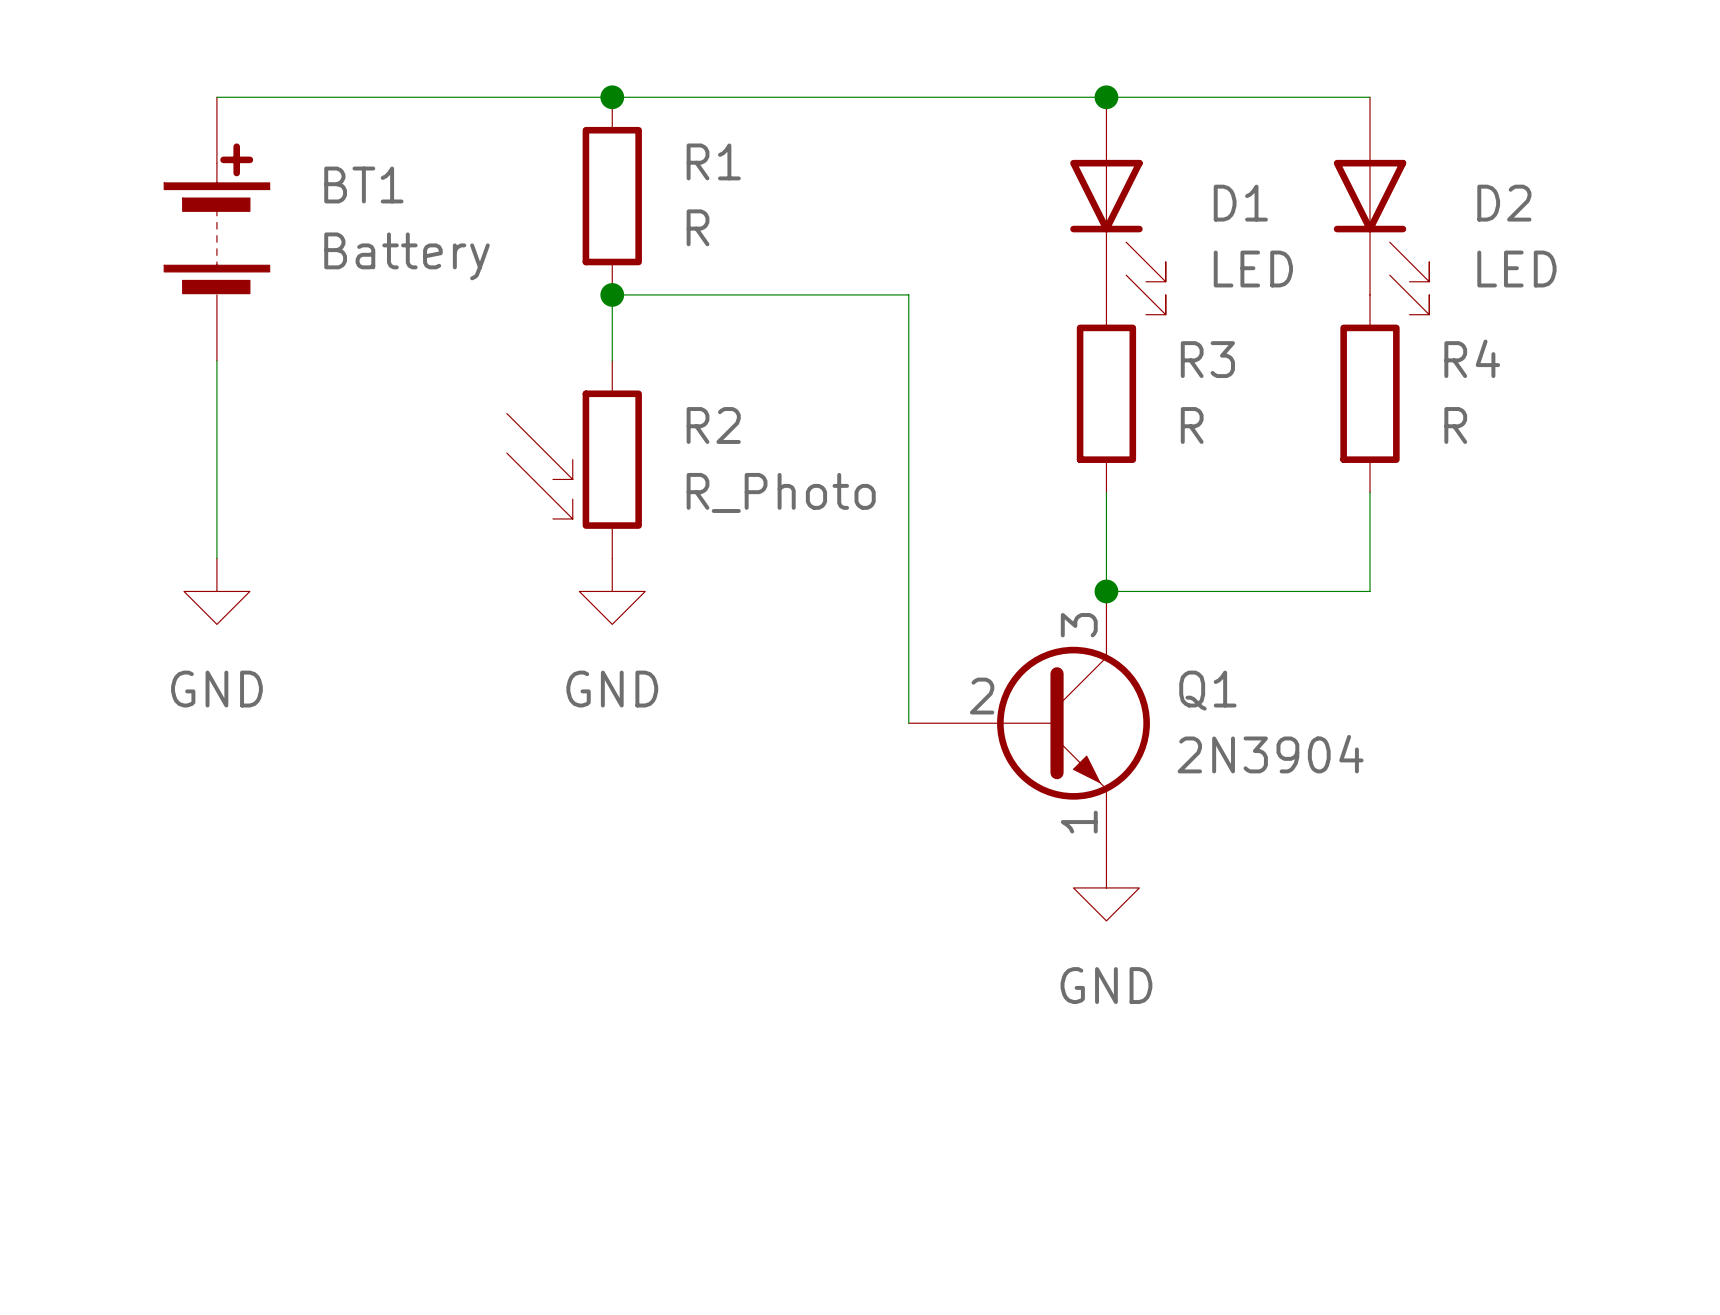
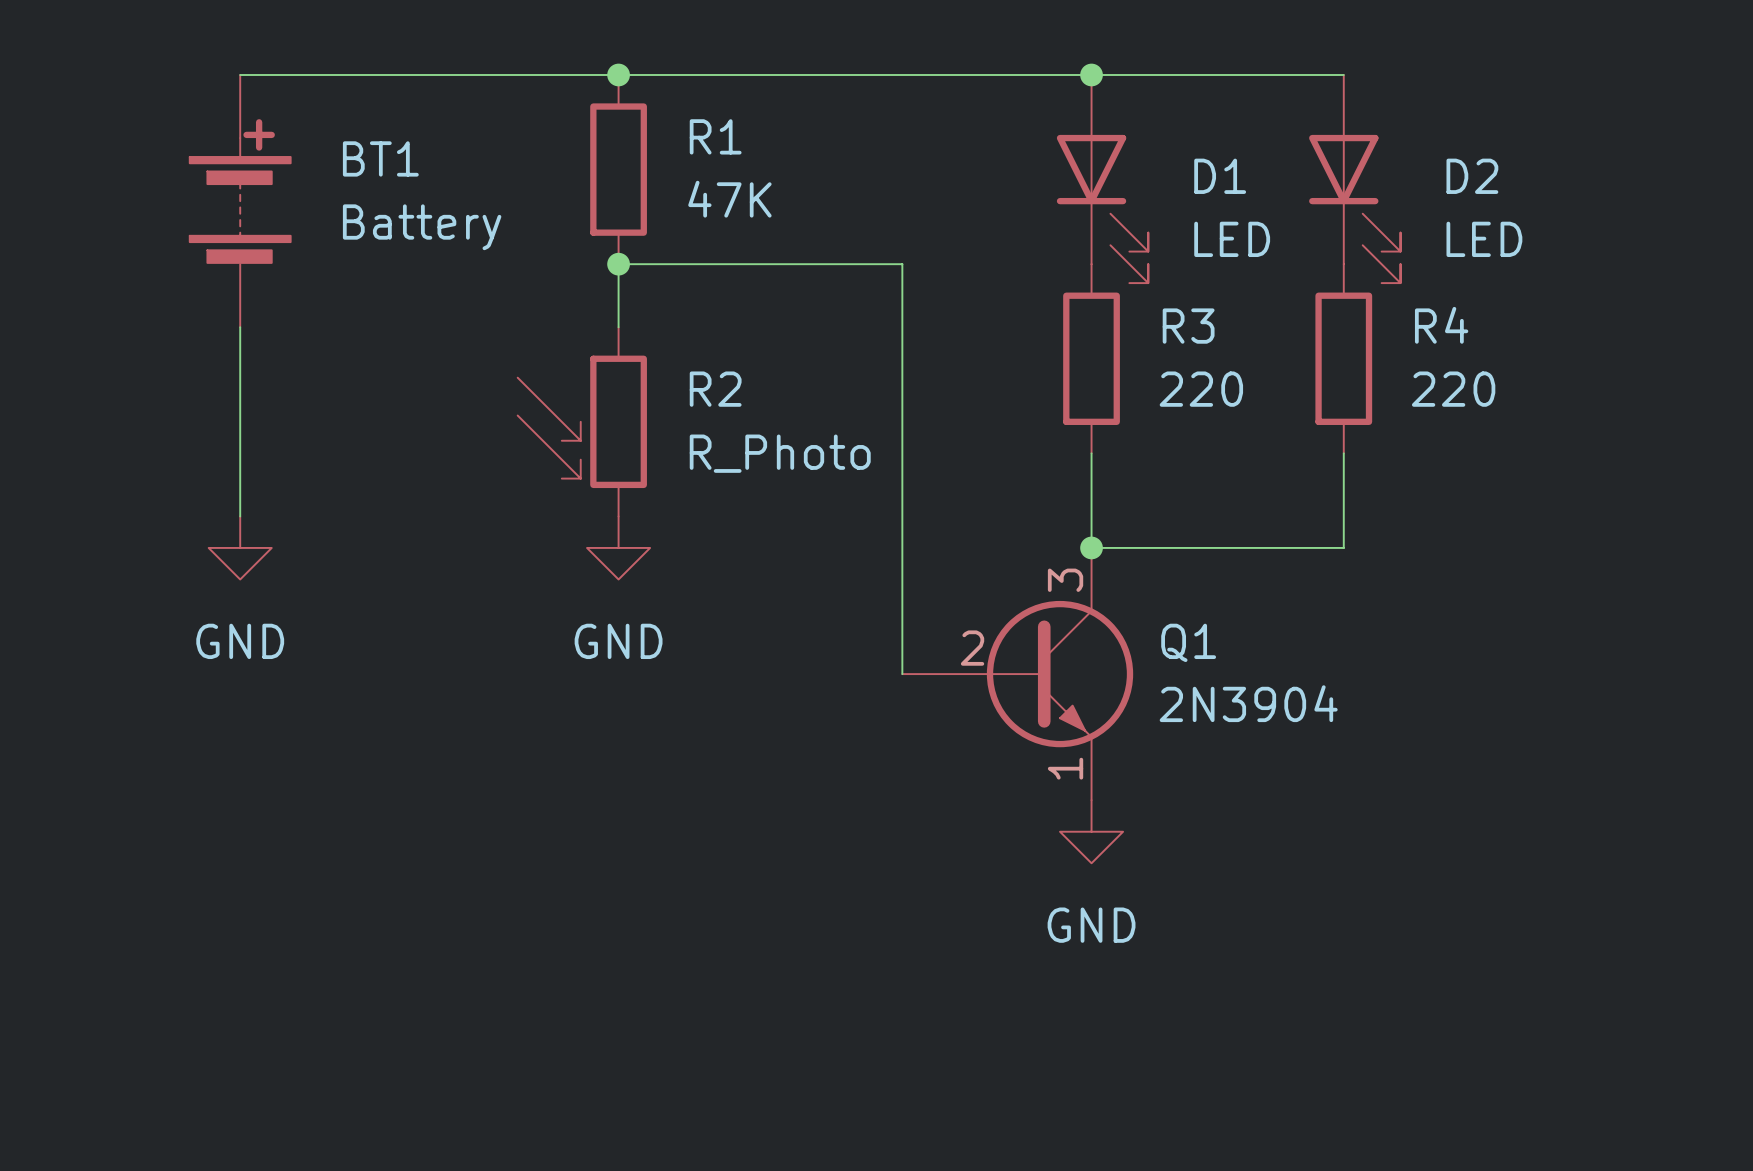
R1 value: R (698, 227) -> 47K (729, 199)
R3 value: R (1192, 425) -> 220 (1201, 389)
R4 value: R (1455, 425) -> 220 (1453, 389)

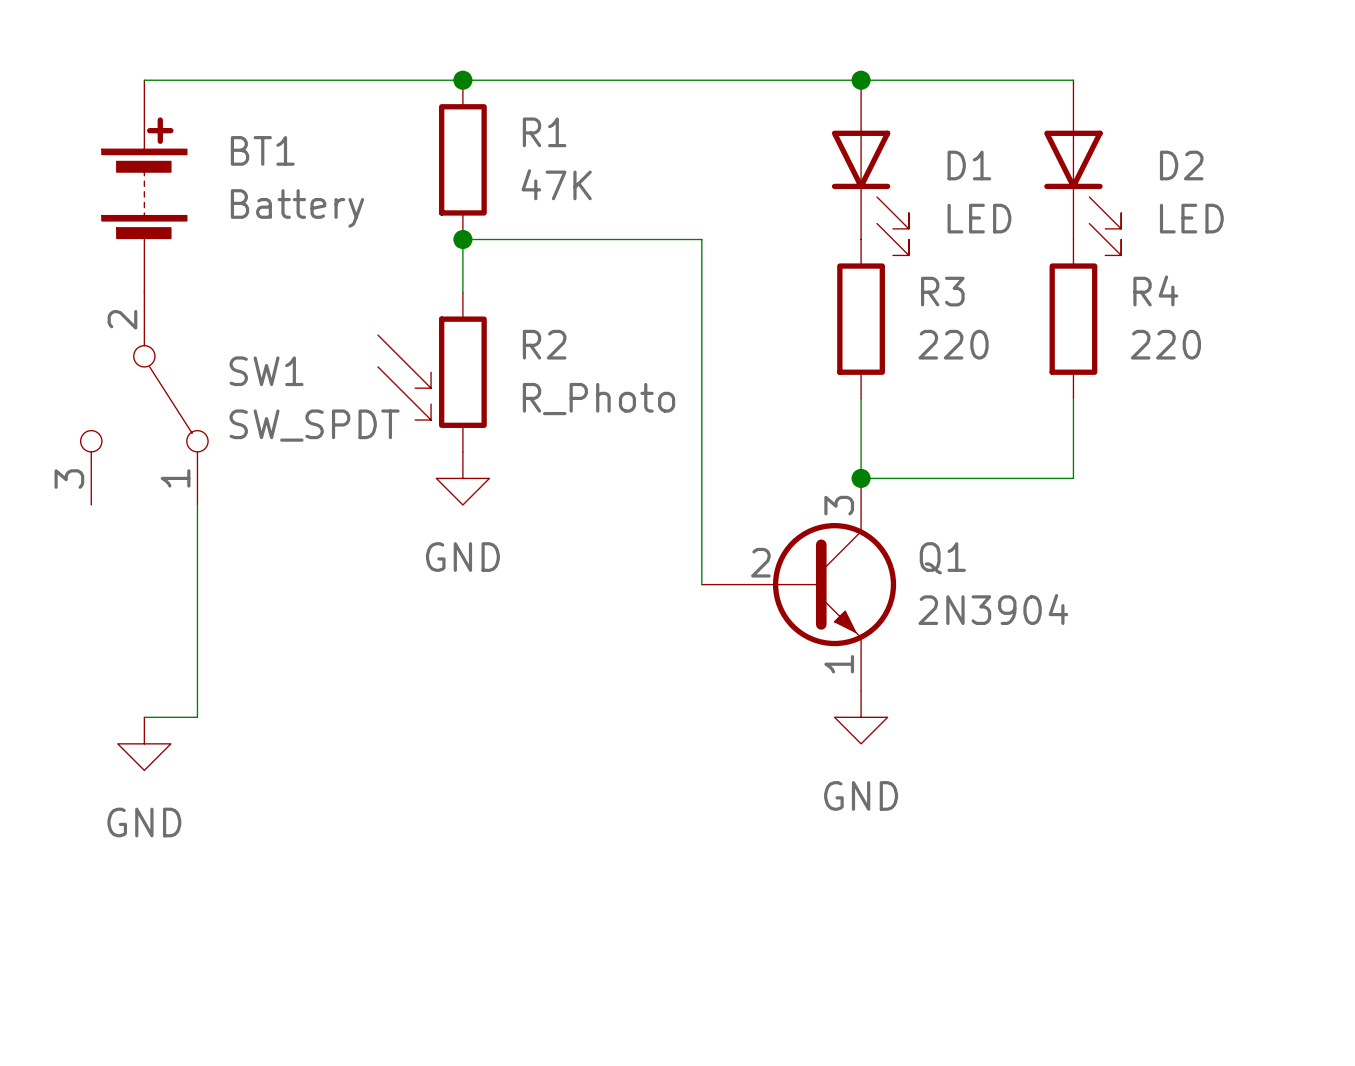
wire: (240, 327) (240, 516) -> none
SW1: none -> SW_SPDT (144, 398)
power symbol position: GND (240, 547) -> GND (144, 743)
wire: none -> (197, 504) (197, 717) (144, 717)

